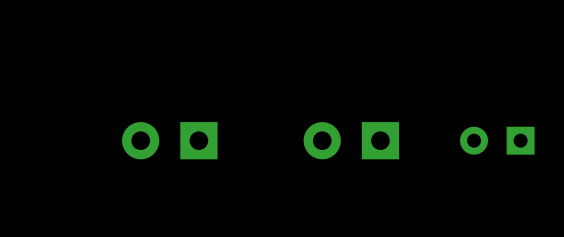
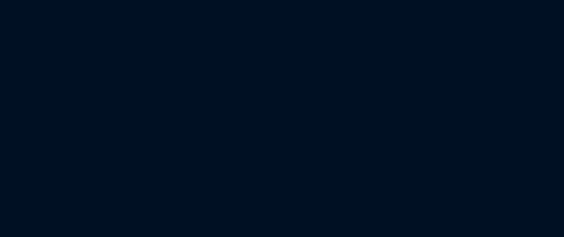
part: (169, 140) -> none
part: (351, 140) -> none
part: (497, 140) -> none

